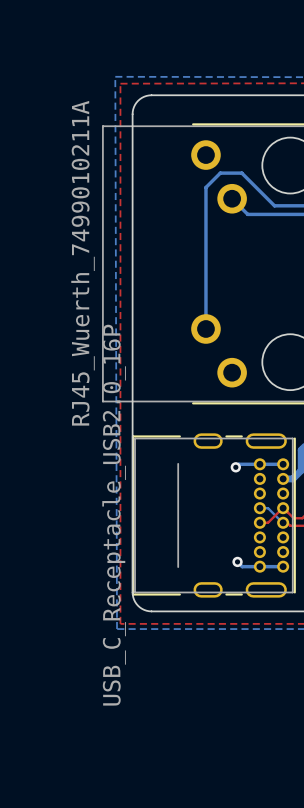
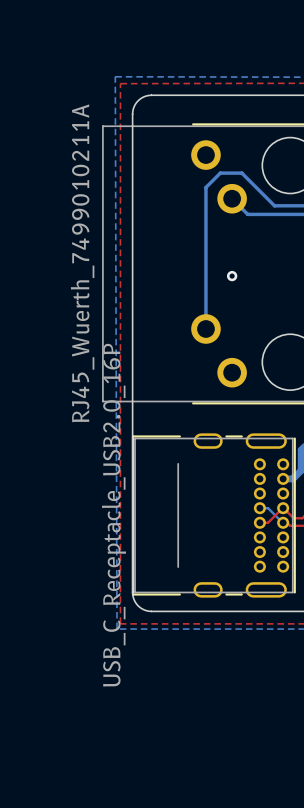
via: none -> (232, 276)
bottom track: (283, 464) (238, 464) (235, 467) -> none
via: (235, 467) -> none
bottom track: (237, 561) (242, 566) (283, 566) -> none
via: (237, 561) -> none

